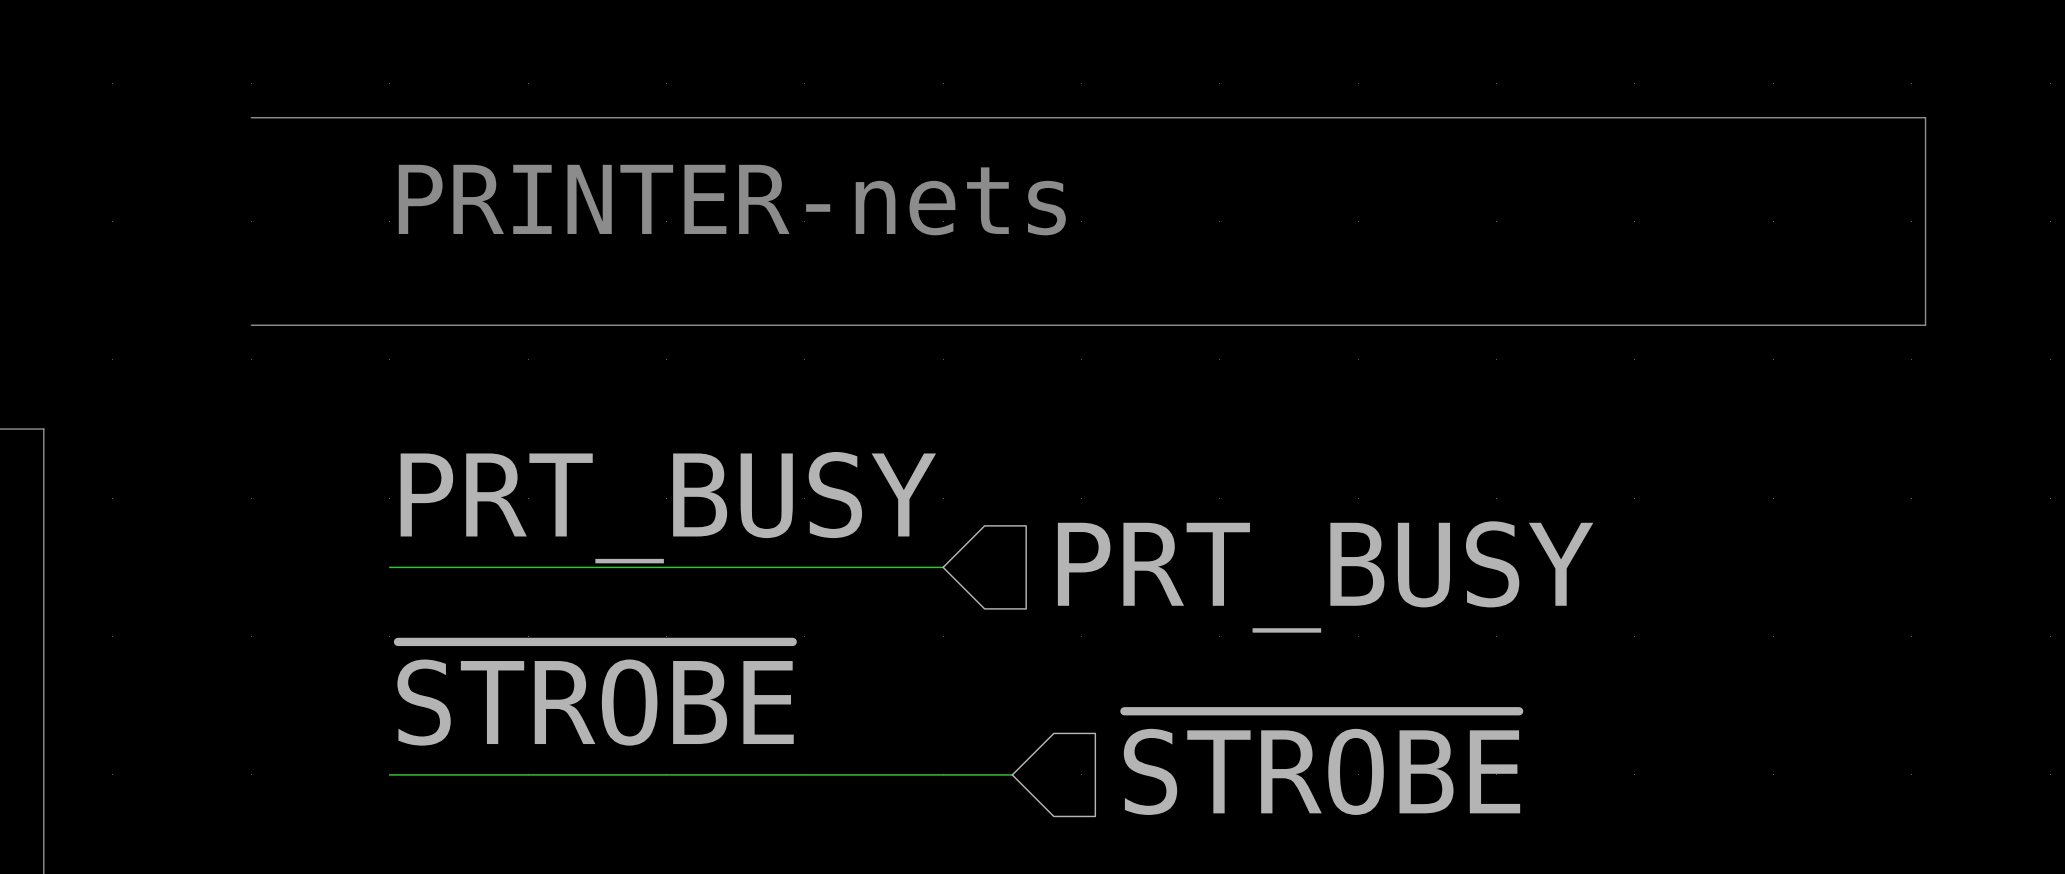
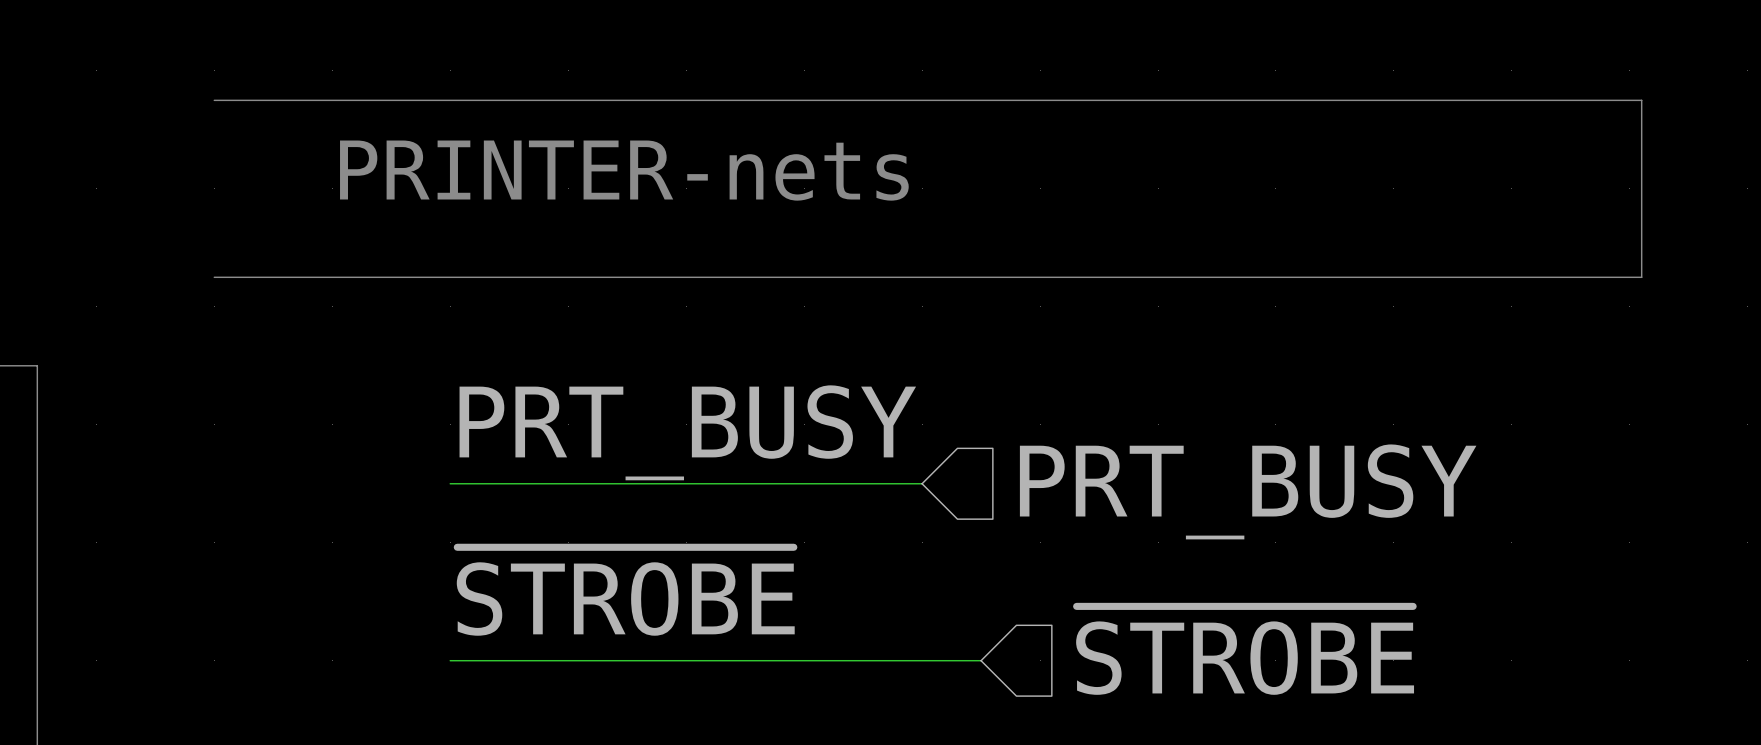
label position: PRT_BUSY (668, 507) -> PRT_BUSY (687, 432)
wire: (389, 567) (528, 567) -> (804, 483) (922, 483)
hierarchical label position: PRT_BUSY (1325, 576) -> PRT_BUSY (1248, 491)
label position: ~{STROBE} (595, 693) -> ~{STROBE} (625, 591)
hierarchical label position: ~{STROBE} (1321, 763) -> ~{STROBE} (1245, 650)
wire: (389, 774) (528, 774) -> (863, 660) (981, 660)

